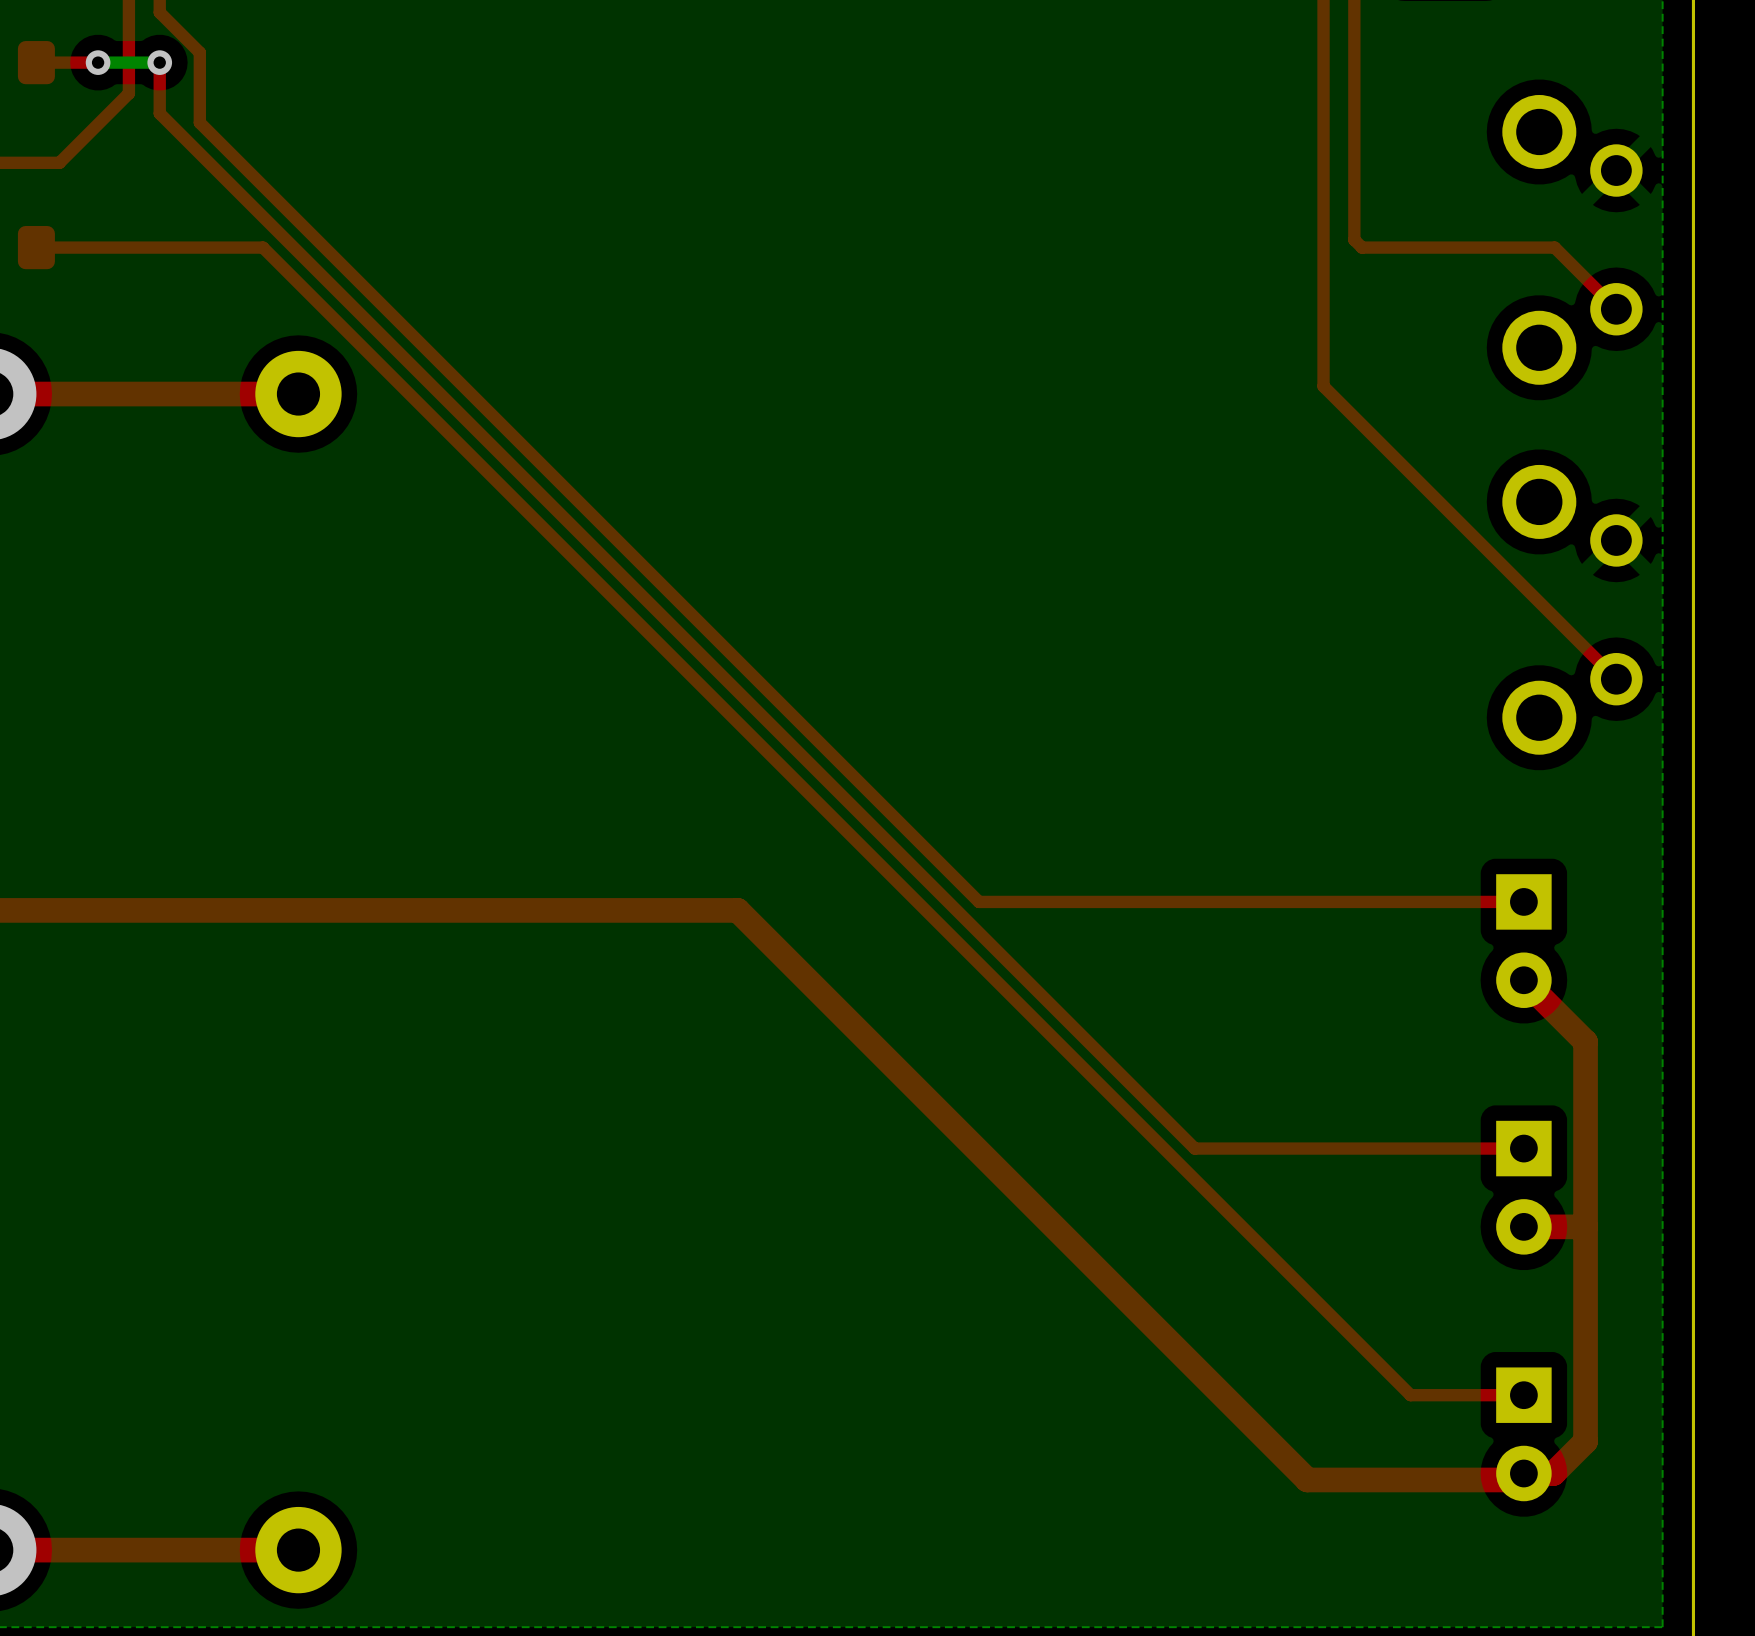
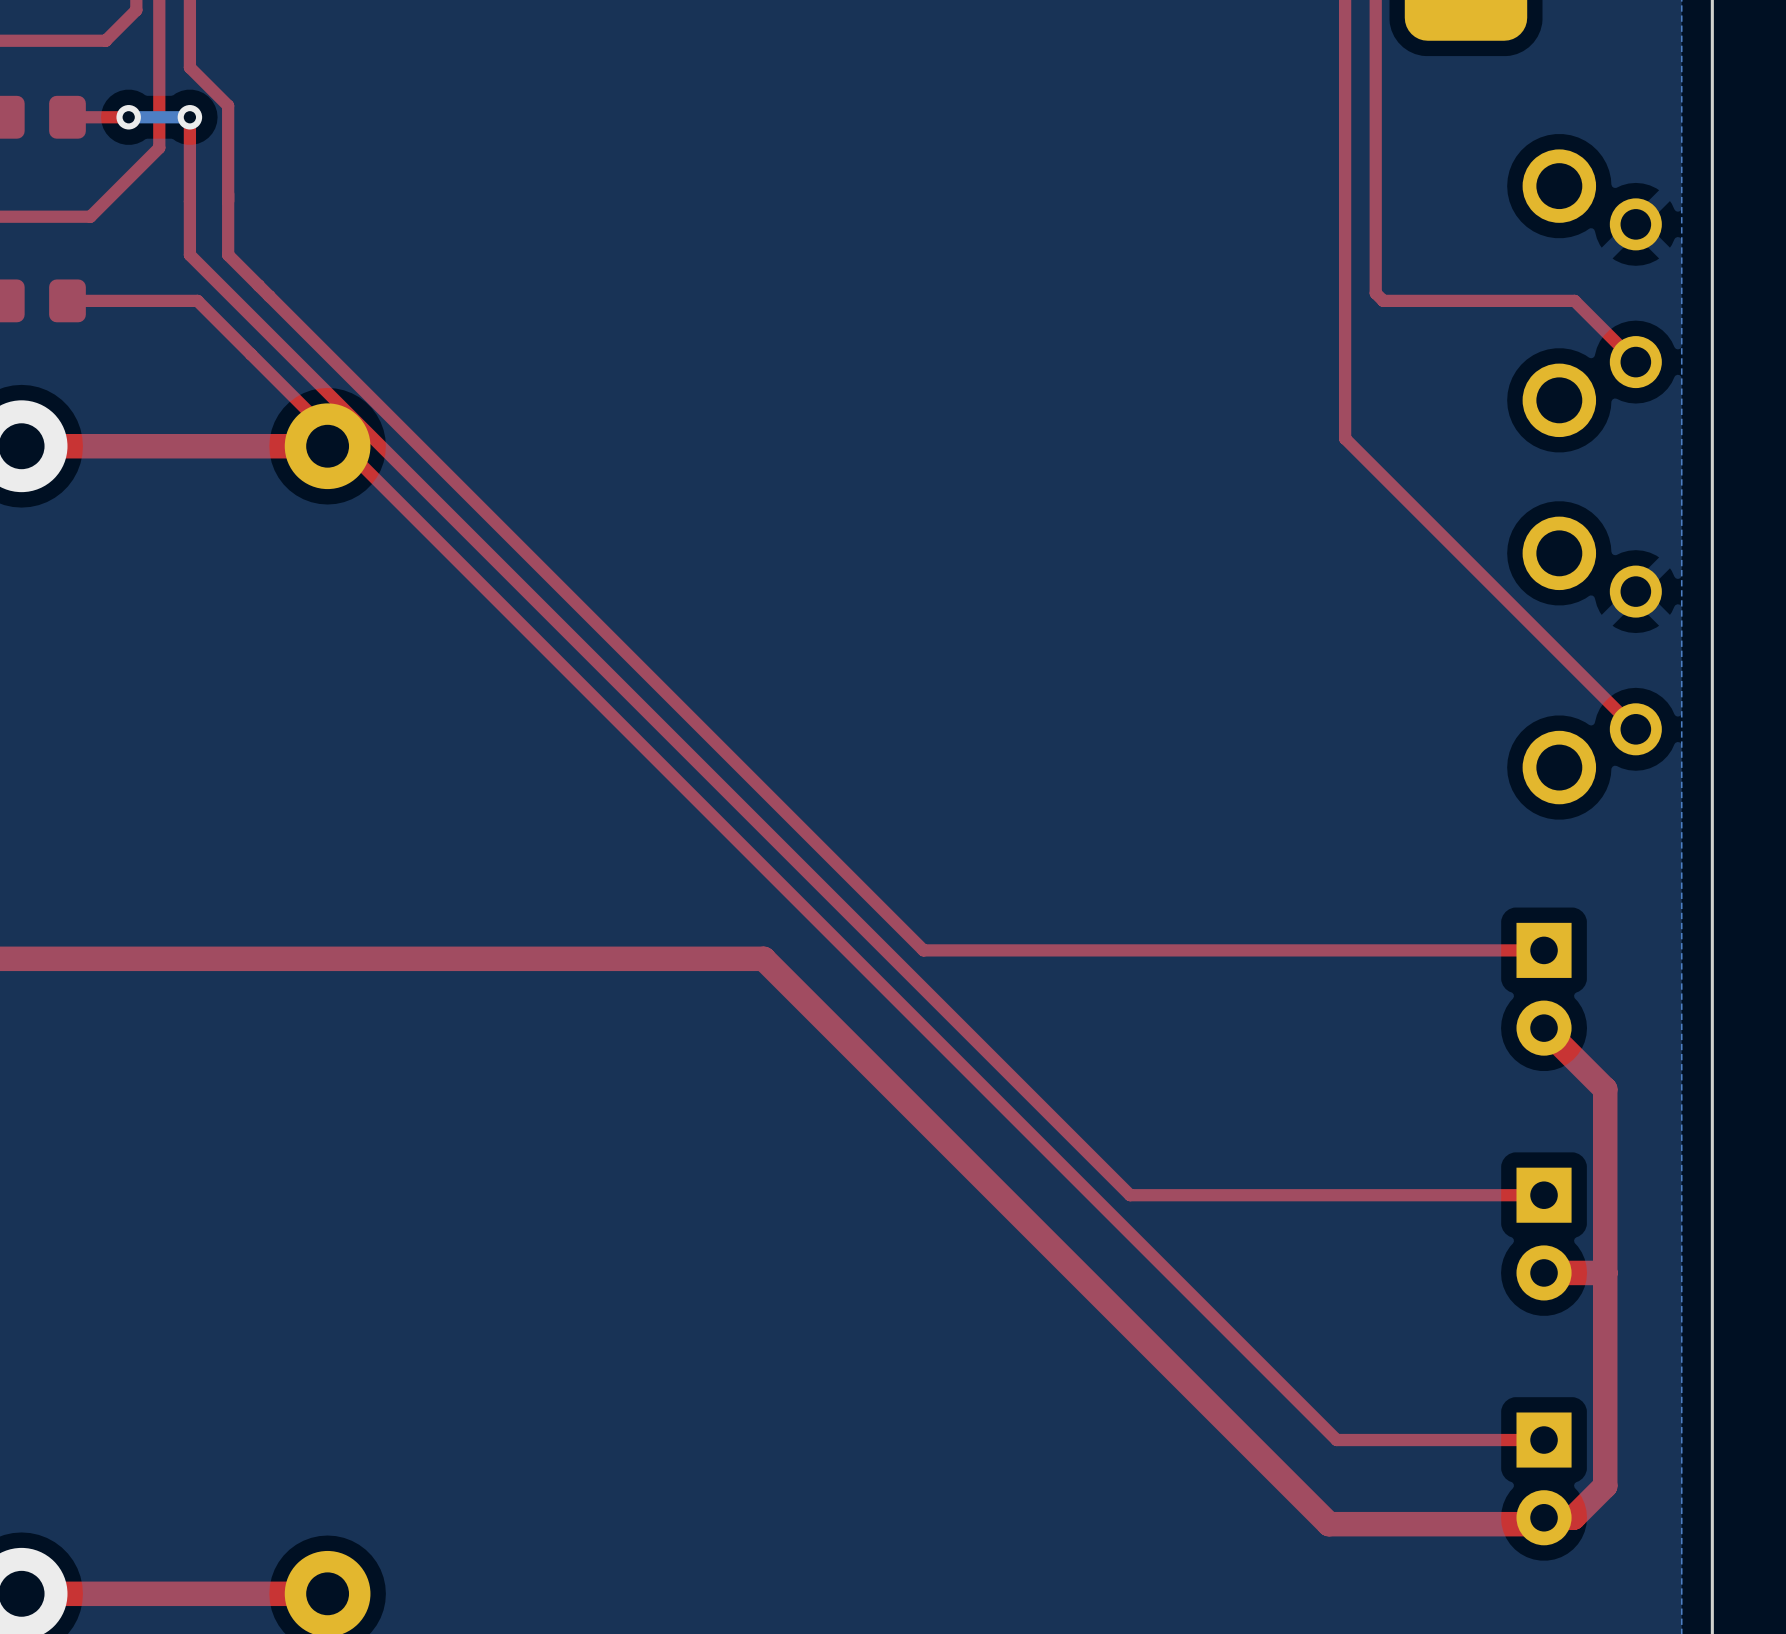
top track: (198, 51) (199, 52) (199, 122) (979, 901) -> (228, 105) (228, 254) (923, 950) (1003, 950)
top track: (159, 113) (1194, 1148) -> (189, 167) (189, 254) (1130, 1195) (1217, 1195)
top track: (167, 247) (263, 247) (1410, 1395) -> (197, 300) (1336, 1440) (1431, 1440)

